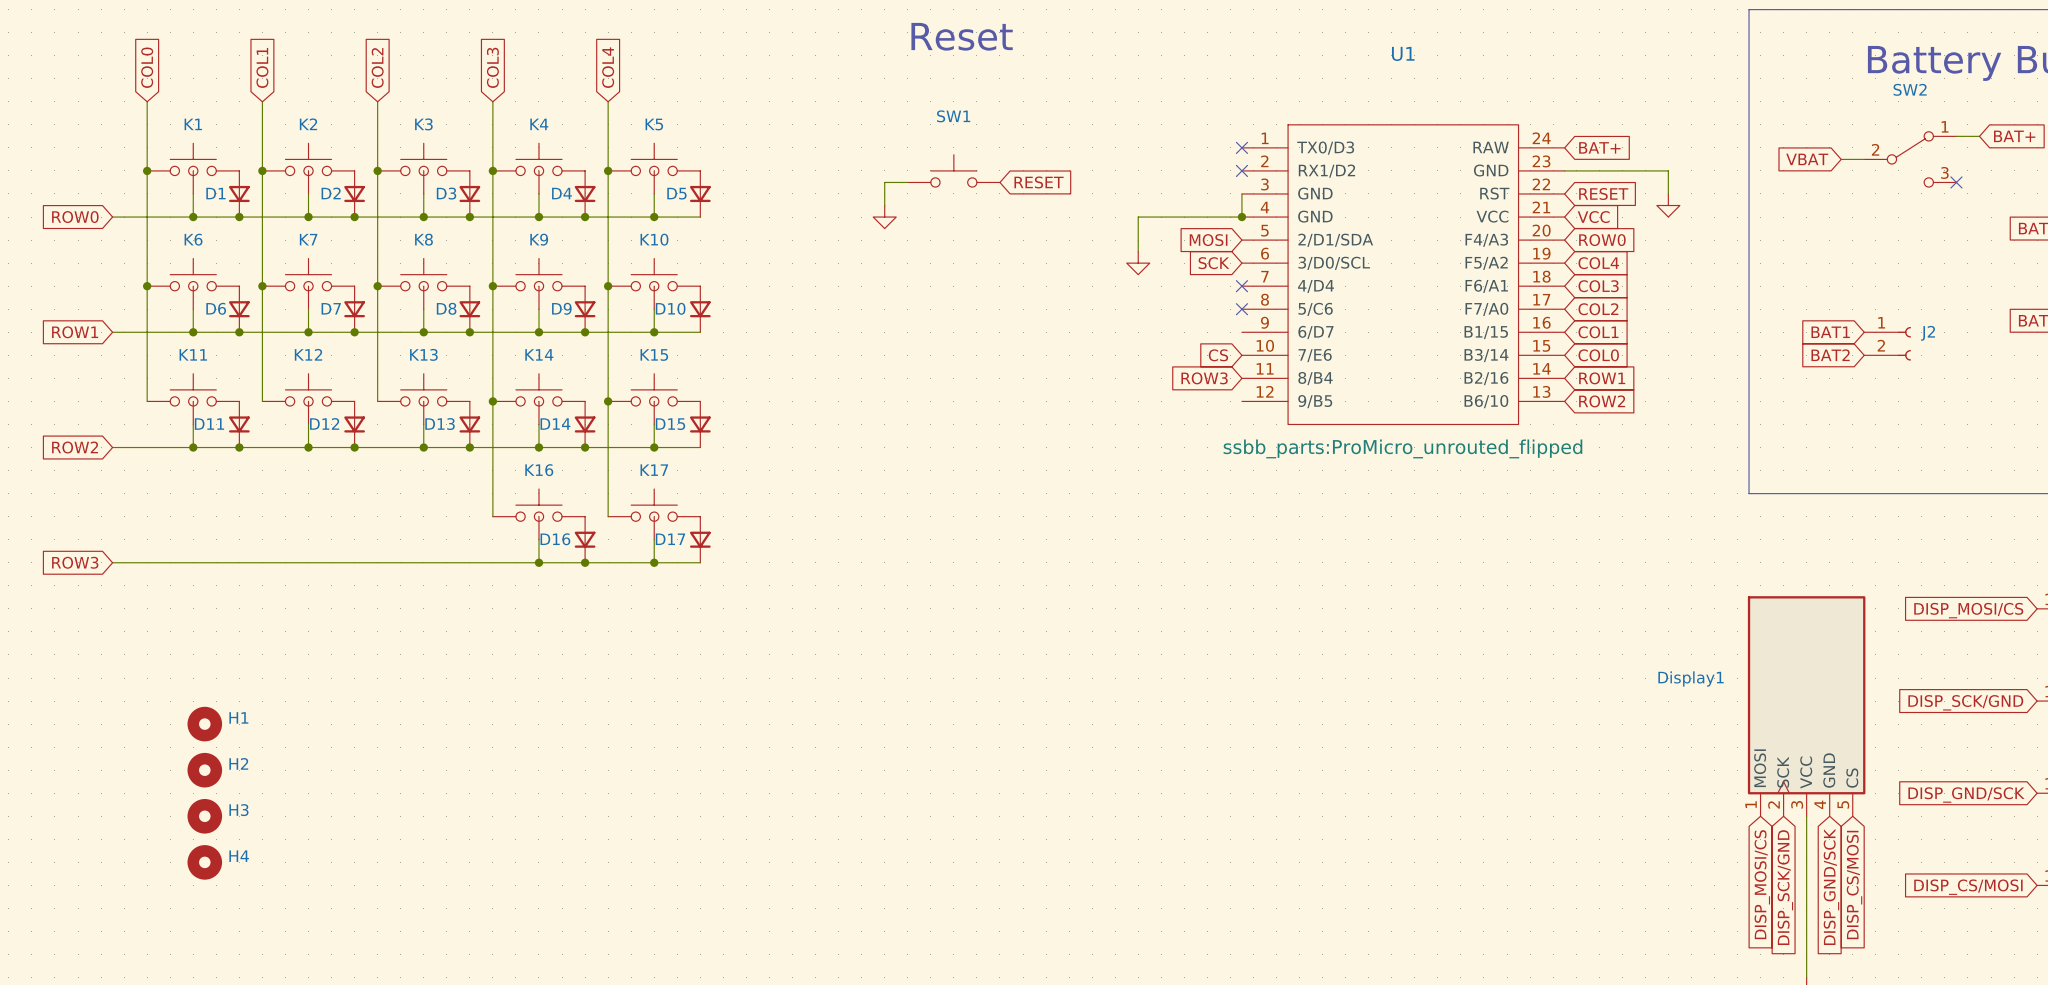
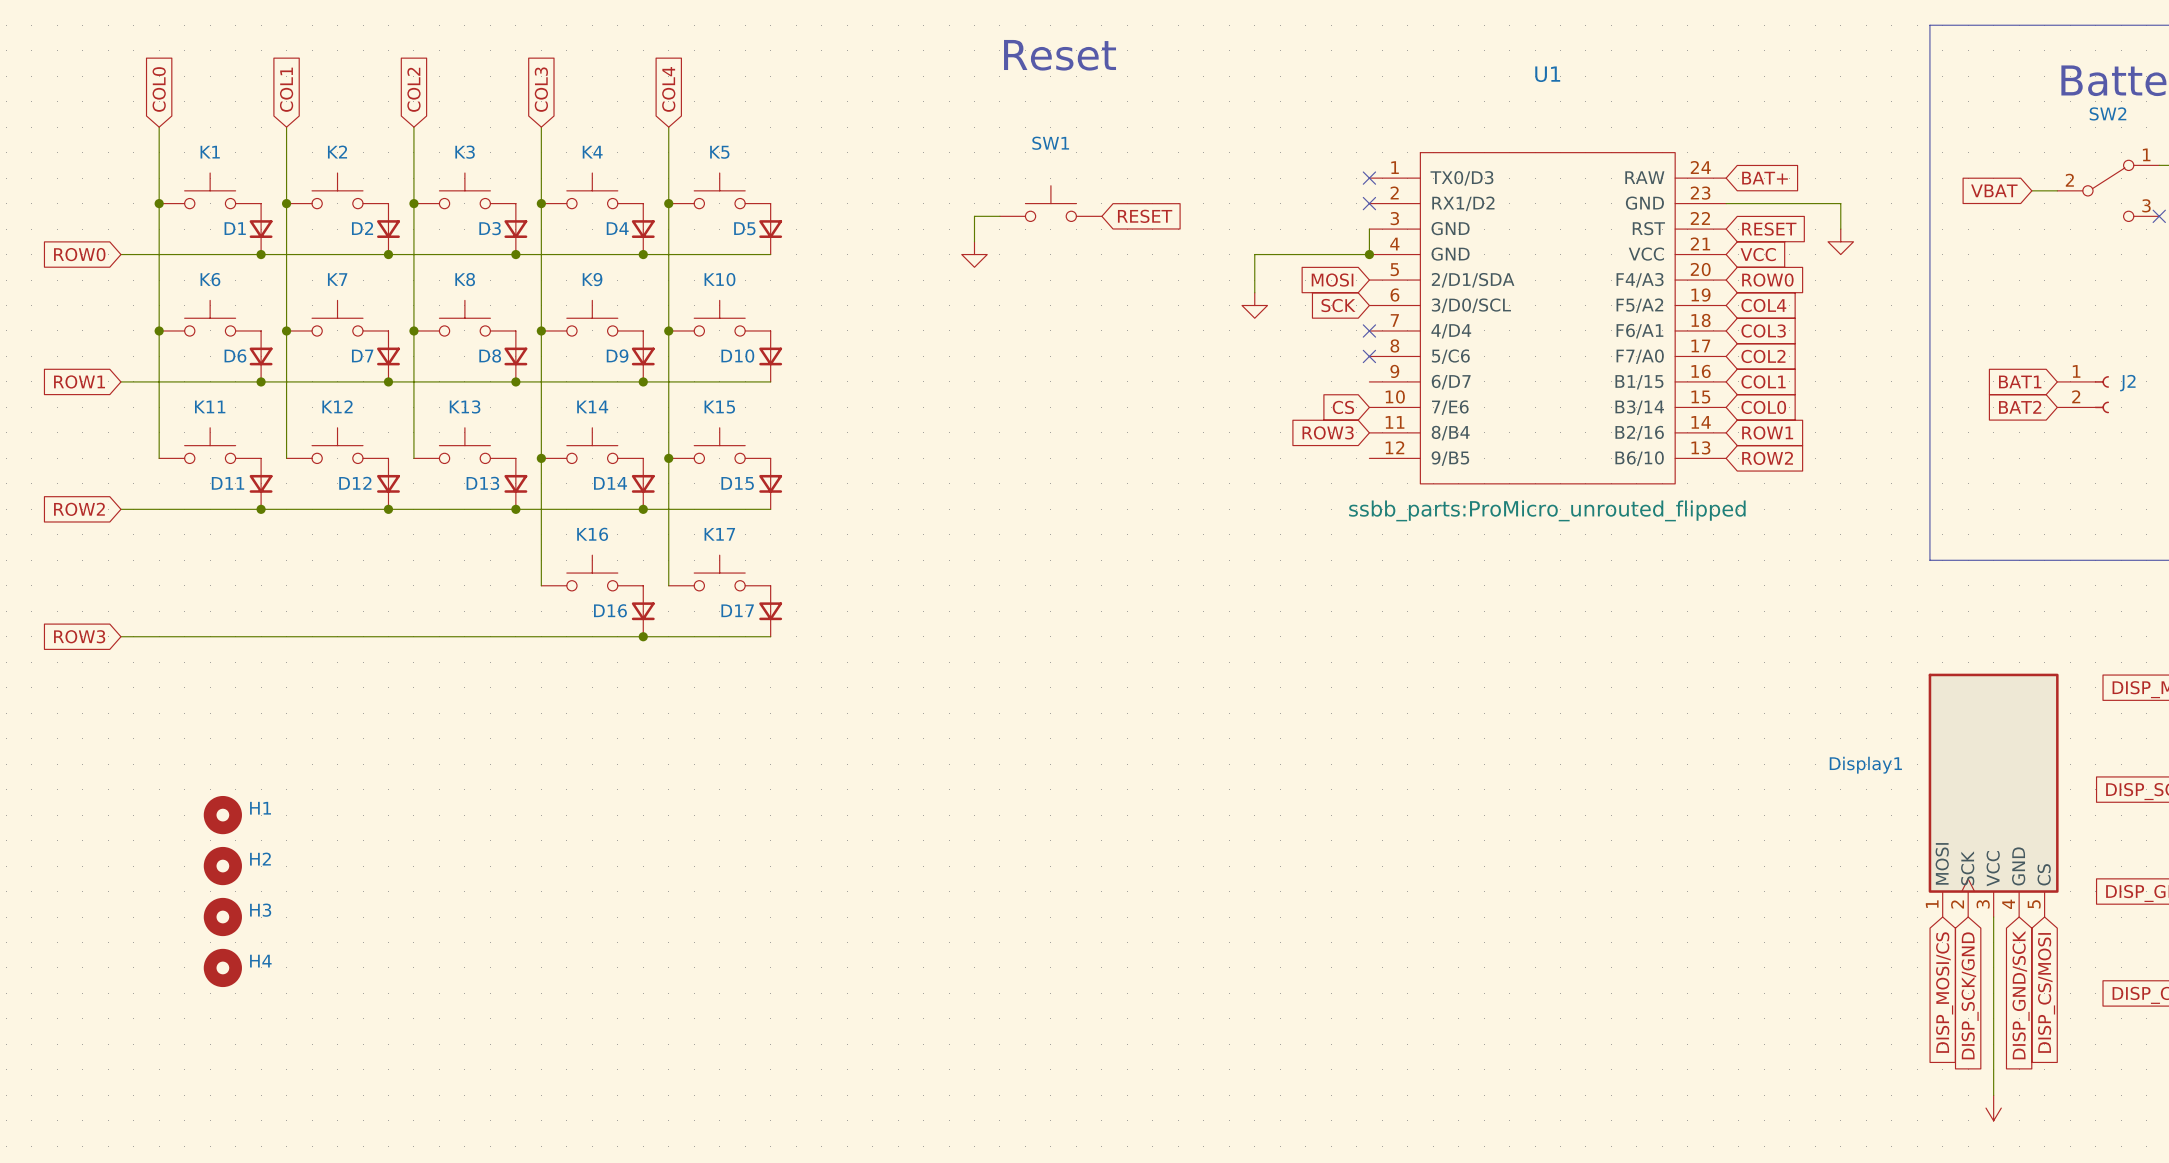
K1 symbol: [147, 143, 240, 194] -> [159, 173, 262, 209]
K2 symbol: [262, 143, 355, 194] -> [286, 173, 389, 209]
K3 symbol: [377, 143, 470, 194] -> [413, 173, 516, 209]
K4 symbol: [492, 143, 586, 194] -> [541, 173, 644, 209]
K5 symbol: [608, 143, 701, 194] -> [668, 173, 771, 209]
wire: (193, 193) (193, 217) -> none
wire: (308, 193) (308, 217) -> none
wire: (423, 193) (423, 217) -> none
wire: (538, 193) (538, 217) -> none
wire: (654, 193) (654, 217) -> none
junction: (193, 217) -> none
junction: (308, 217) -> none
junction: (423, 217) -> none
junction: (538, 217) -> none
junction: (654, 217) -> none
K6 symbol: [147, 258, 240, 310] -> [159, 300, 262, 337]
K7 symbol: [262, 258, 355, 310] -> [286, 300, 389, 337]
K8 symbol: [377, 258, 470, 310] -> [413, 300, 516, 337]
K9 symbol: [492, 258, 586, 310] -> [541, 300, 644, 337]
K10 symbol: [608, 258, 701, 310] -> [668, 300, 771, 337]
wire: (193, 309) (193, 332) -> none
wire: (308, 309) (308, 332) -> none
wire: (423, 309) (423, 332) -> none
wire: (538, 309) (538, 332) -> none
wire: (654, 309) (654, 332) -> none
junction: (193, 332) -> none
junction: (308, 332) -> none
junction: (423, 332) -> none
junction: (538, 332) -> none
junction: (654, 332) -> none
K11 symbol: [147, 373, 240, 425] -> [159, 427, 262, 464]
K12 symbol: [262, 373, 355, 425] -> [286, 427, 389, 464]
K13 symbol: [377, 373, 470, 425] -> [413, 427, 516, 464]
K14 symbol: [492, 373, 586, 425] -> [541, 427, 644, 464]
K15 symbol: [608, 373, 701, 425] -> [668, 427, 771, 464]
wire: (193, 424) (193, 447) -> none
wire: (308, 424) (308, 447) -> none
wire: (423, 424) (423, 447) -> none
wire: (538, 424) (538, 447) -> none
wire: (654, 424) (654, 447) -> none
junction: (193, 447) -> none
junction: (308, 447) -> none
junction: (423, 447) -> none
junction: (538, 447) -> none
junction: (654, 447) -> none
K16 symbol: [492, 489, 586, 540] -> [541, 555, 644, 591]
K17 symbol: [608, 489, 701, 540] -> [668, 555, 771, 591]
wire: (538, 539) (538, 562) -> none
wire: (654, 539) (654, 562) -> none
junction: (538, 562) -> none
junction: (654, 562) -> none

